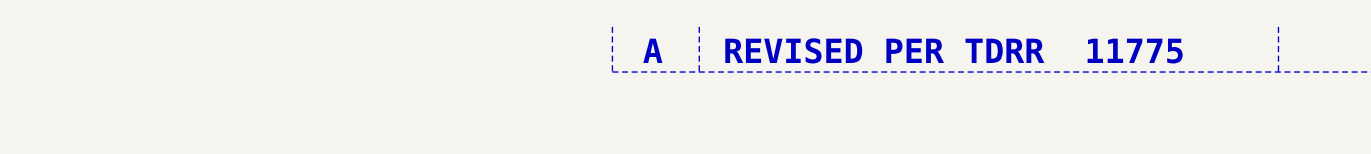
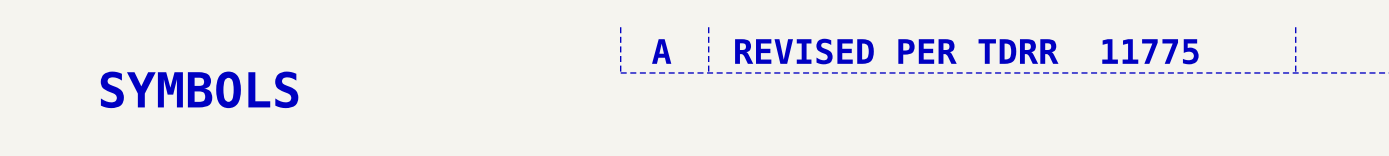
text: none -> SYMBOLS (199, 89)

